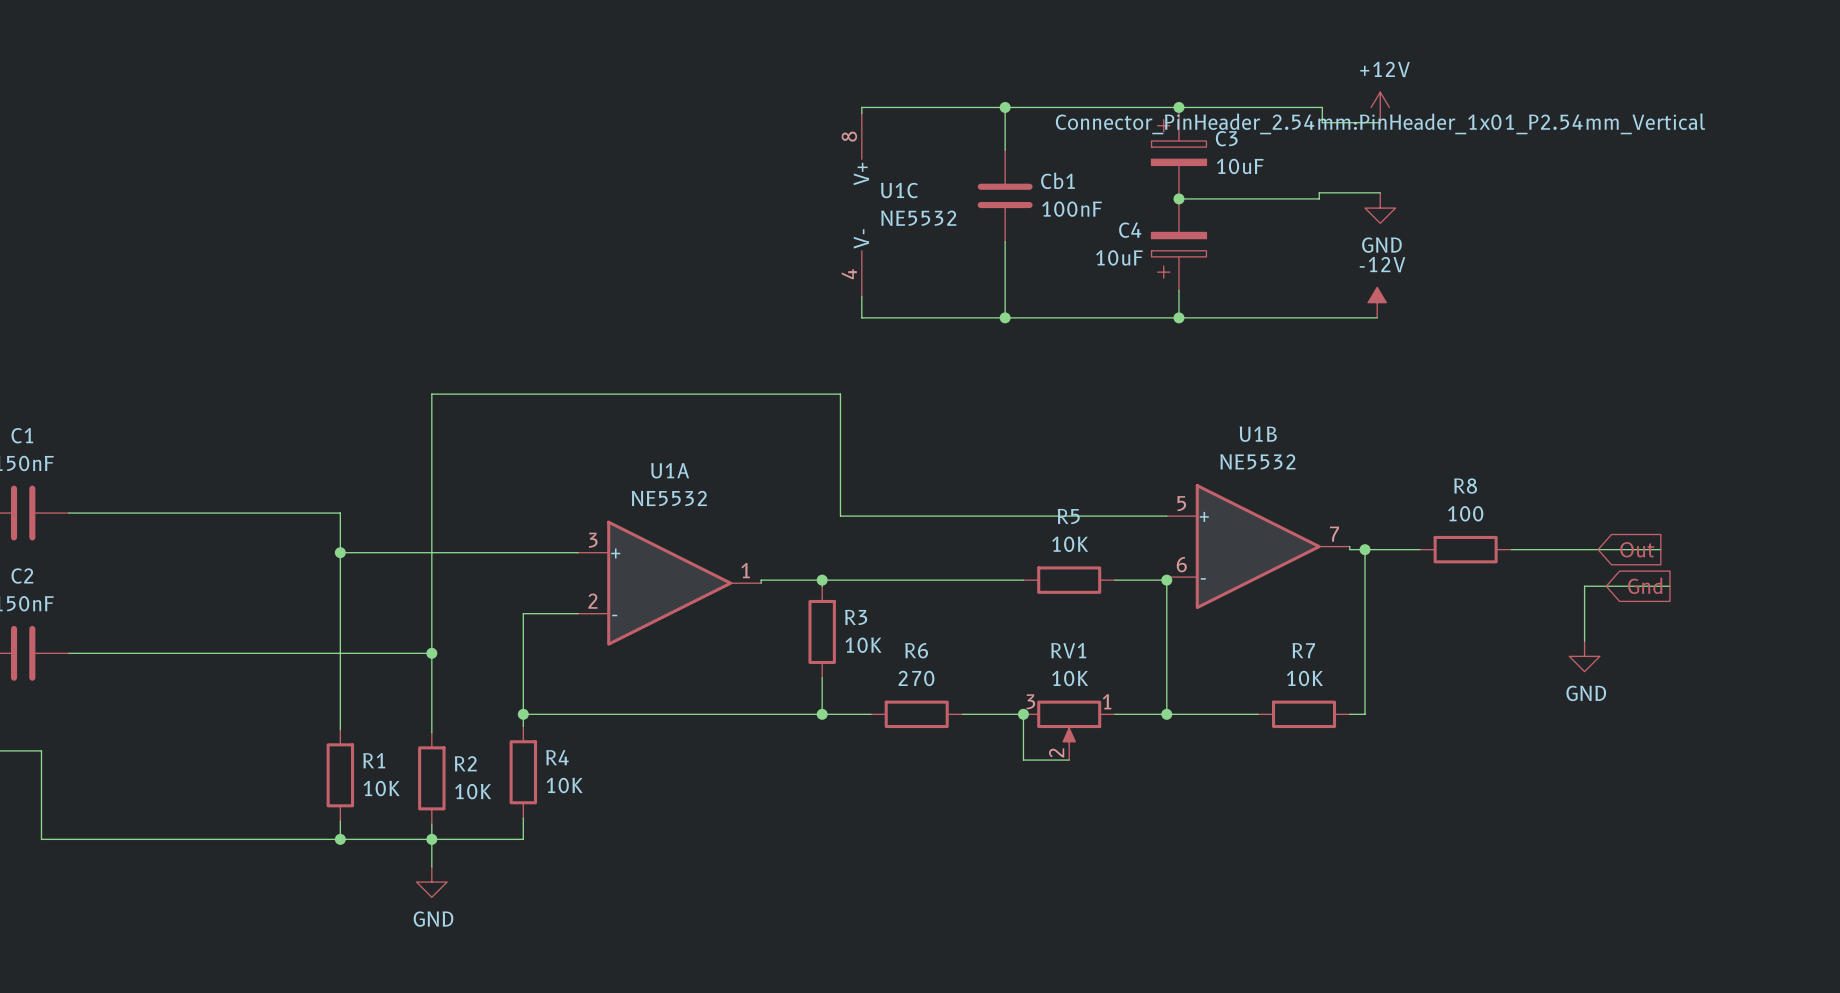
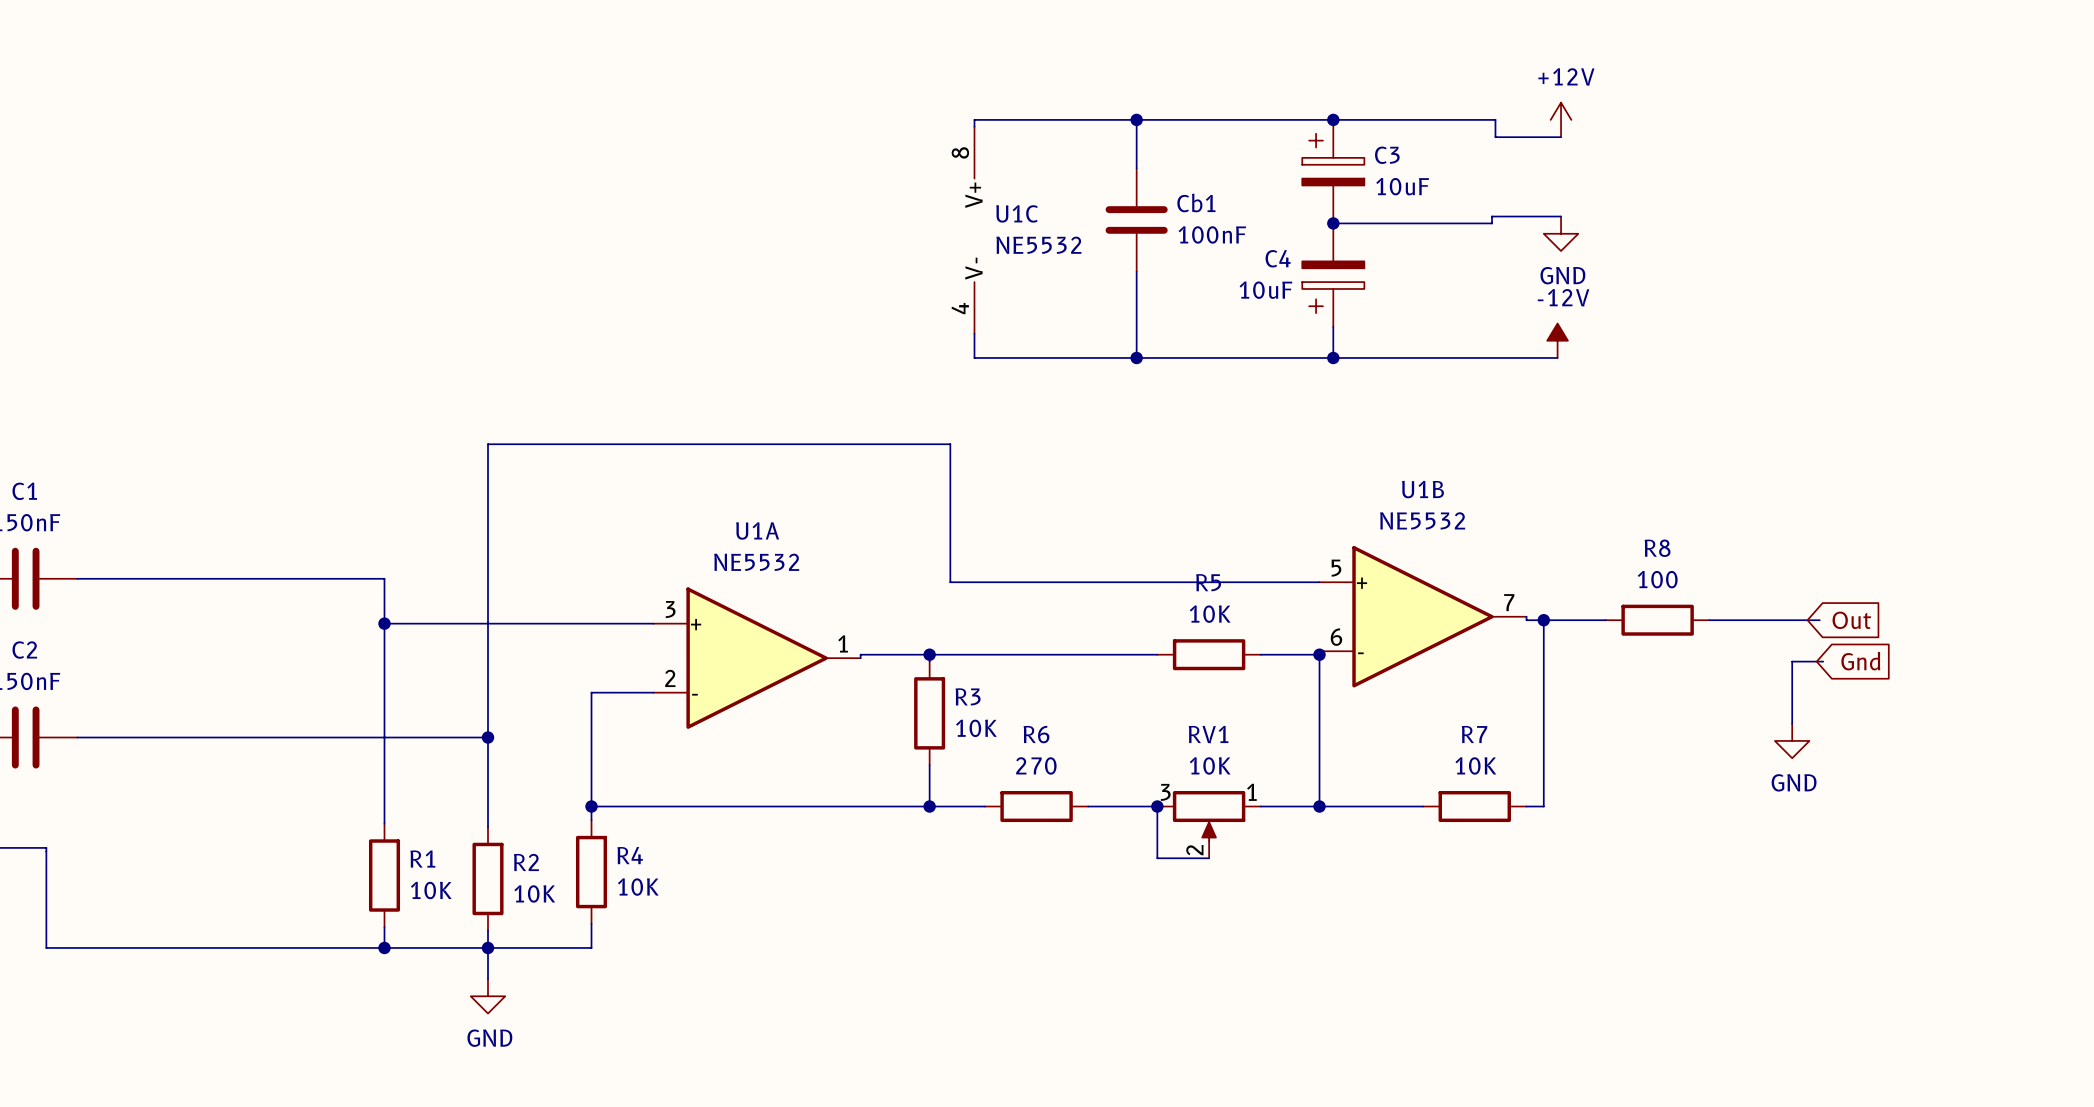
power symbol text: Connector_PinHeader_2.54mm:PinHeader_1x01_P2.54mm_Vertical (1380, 123) -> none
wire: (1608, 549) (1660, 549) -> none
wire: (1612, 586) (1669, 586) -> none

